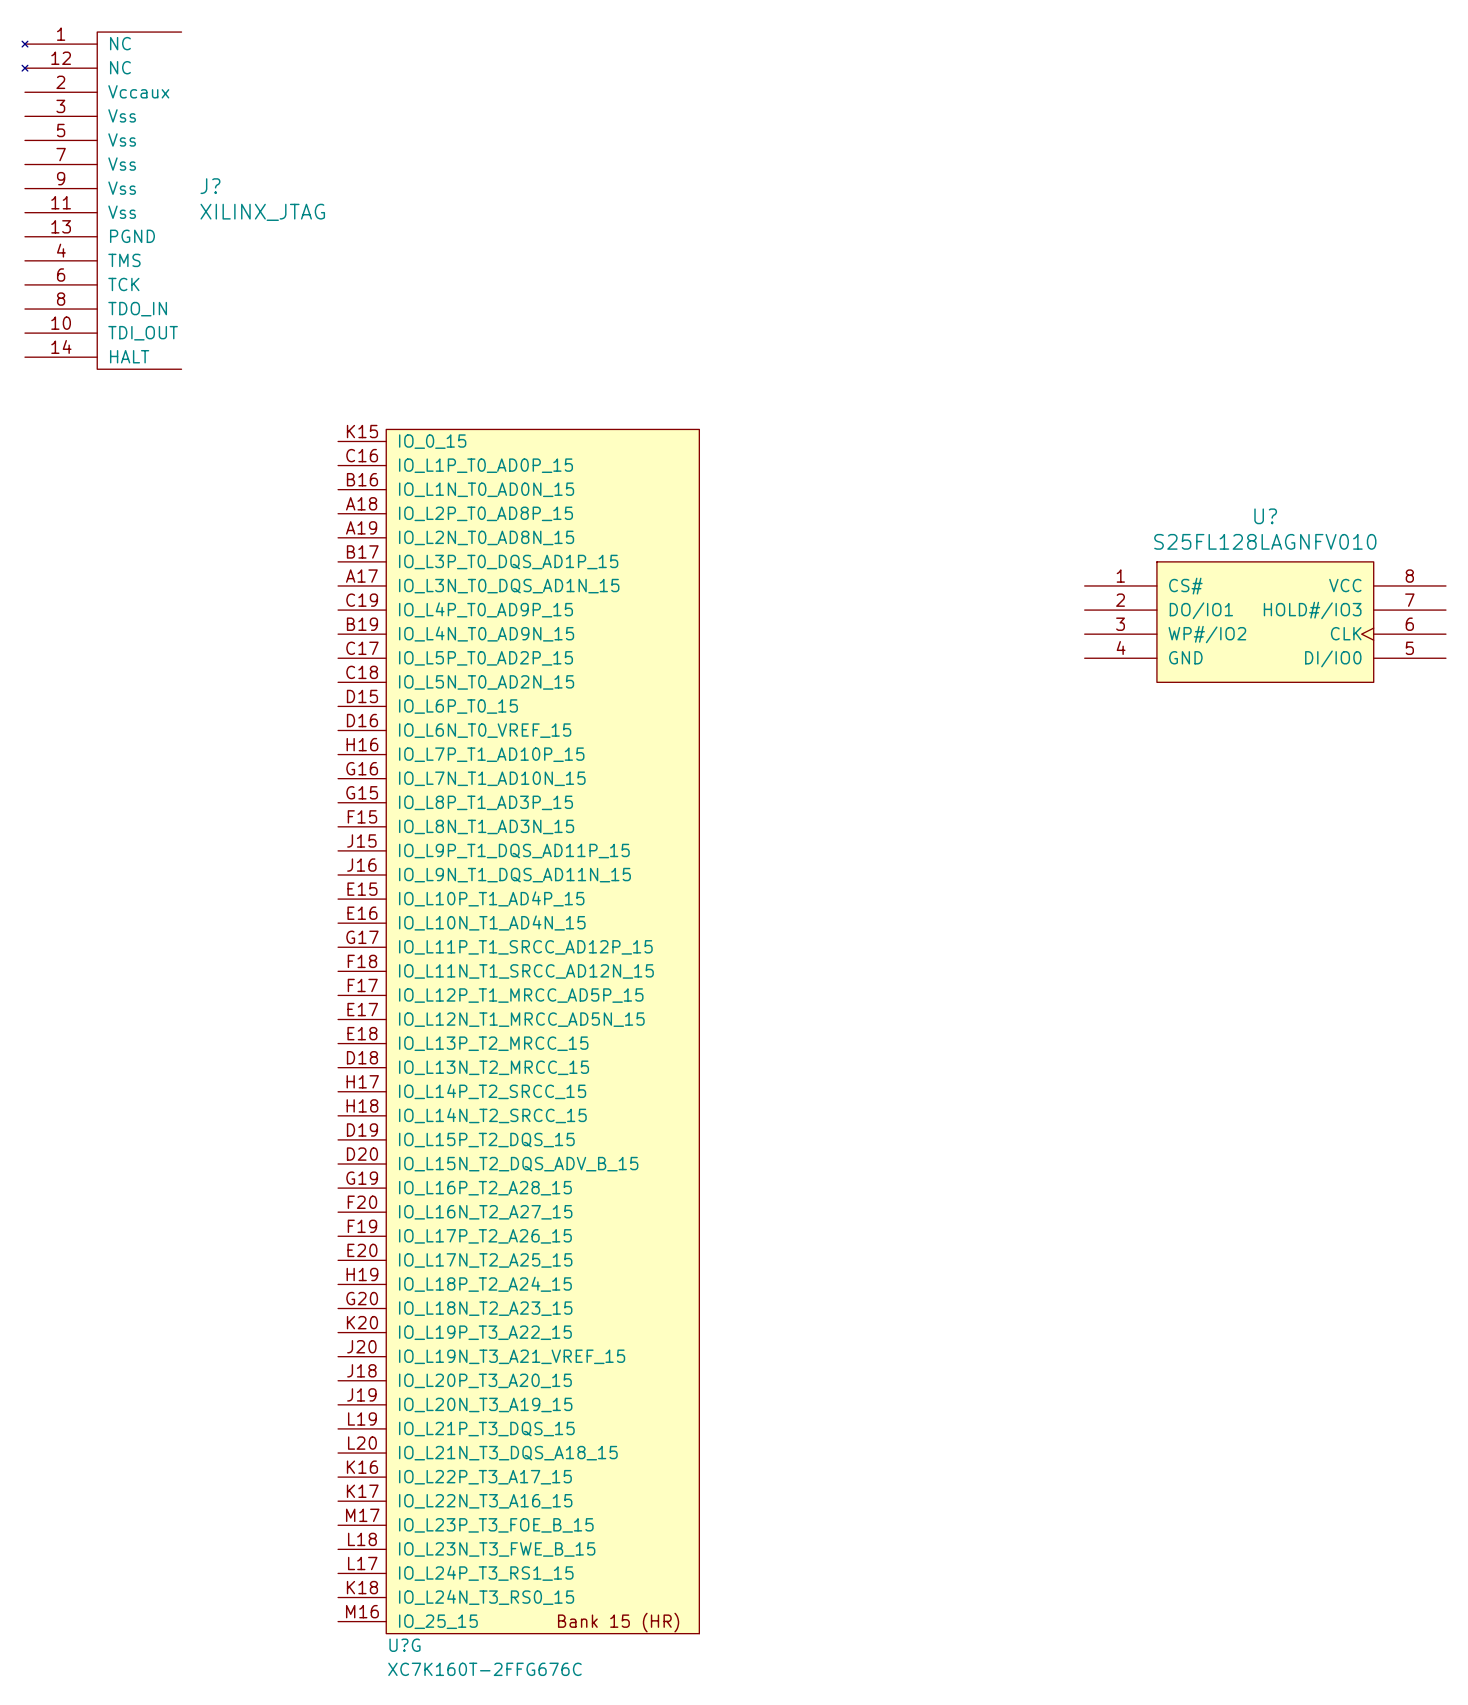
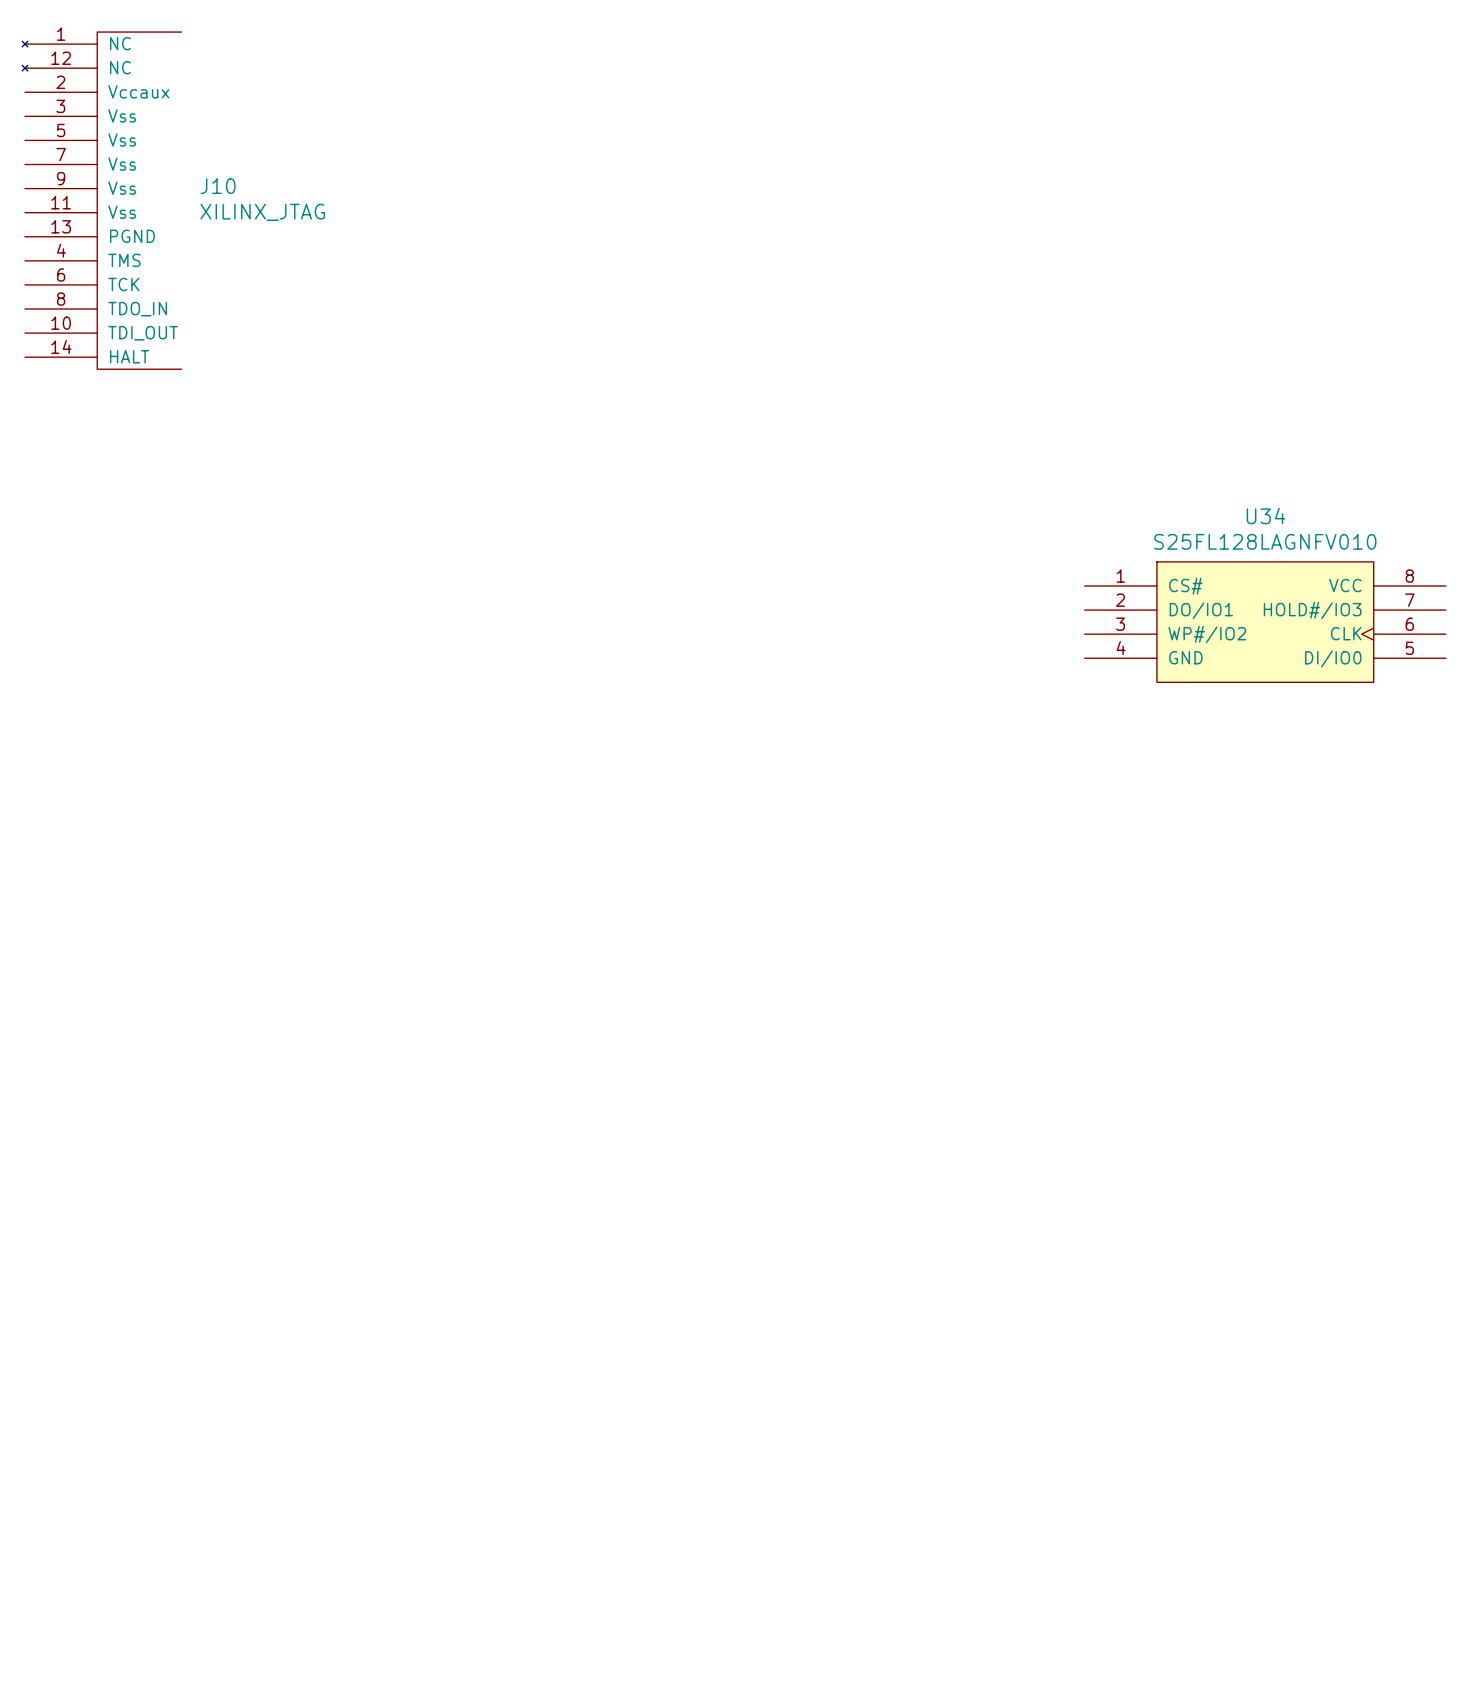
J? name: J? (210, 186) -> J10 (218, 186)
U? name: U? (1265, 516) -> U34 (1266, 515)
U?G: XC7K160T-2FFG676C (518, 1031) -> none

